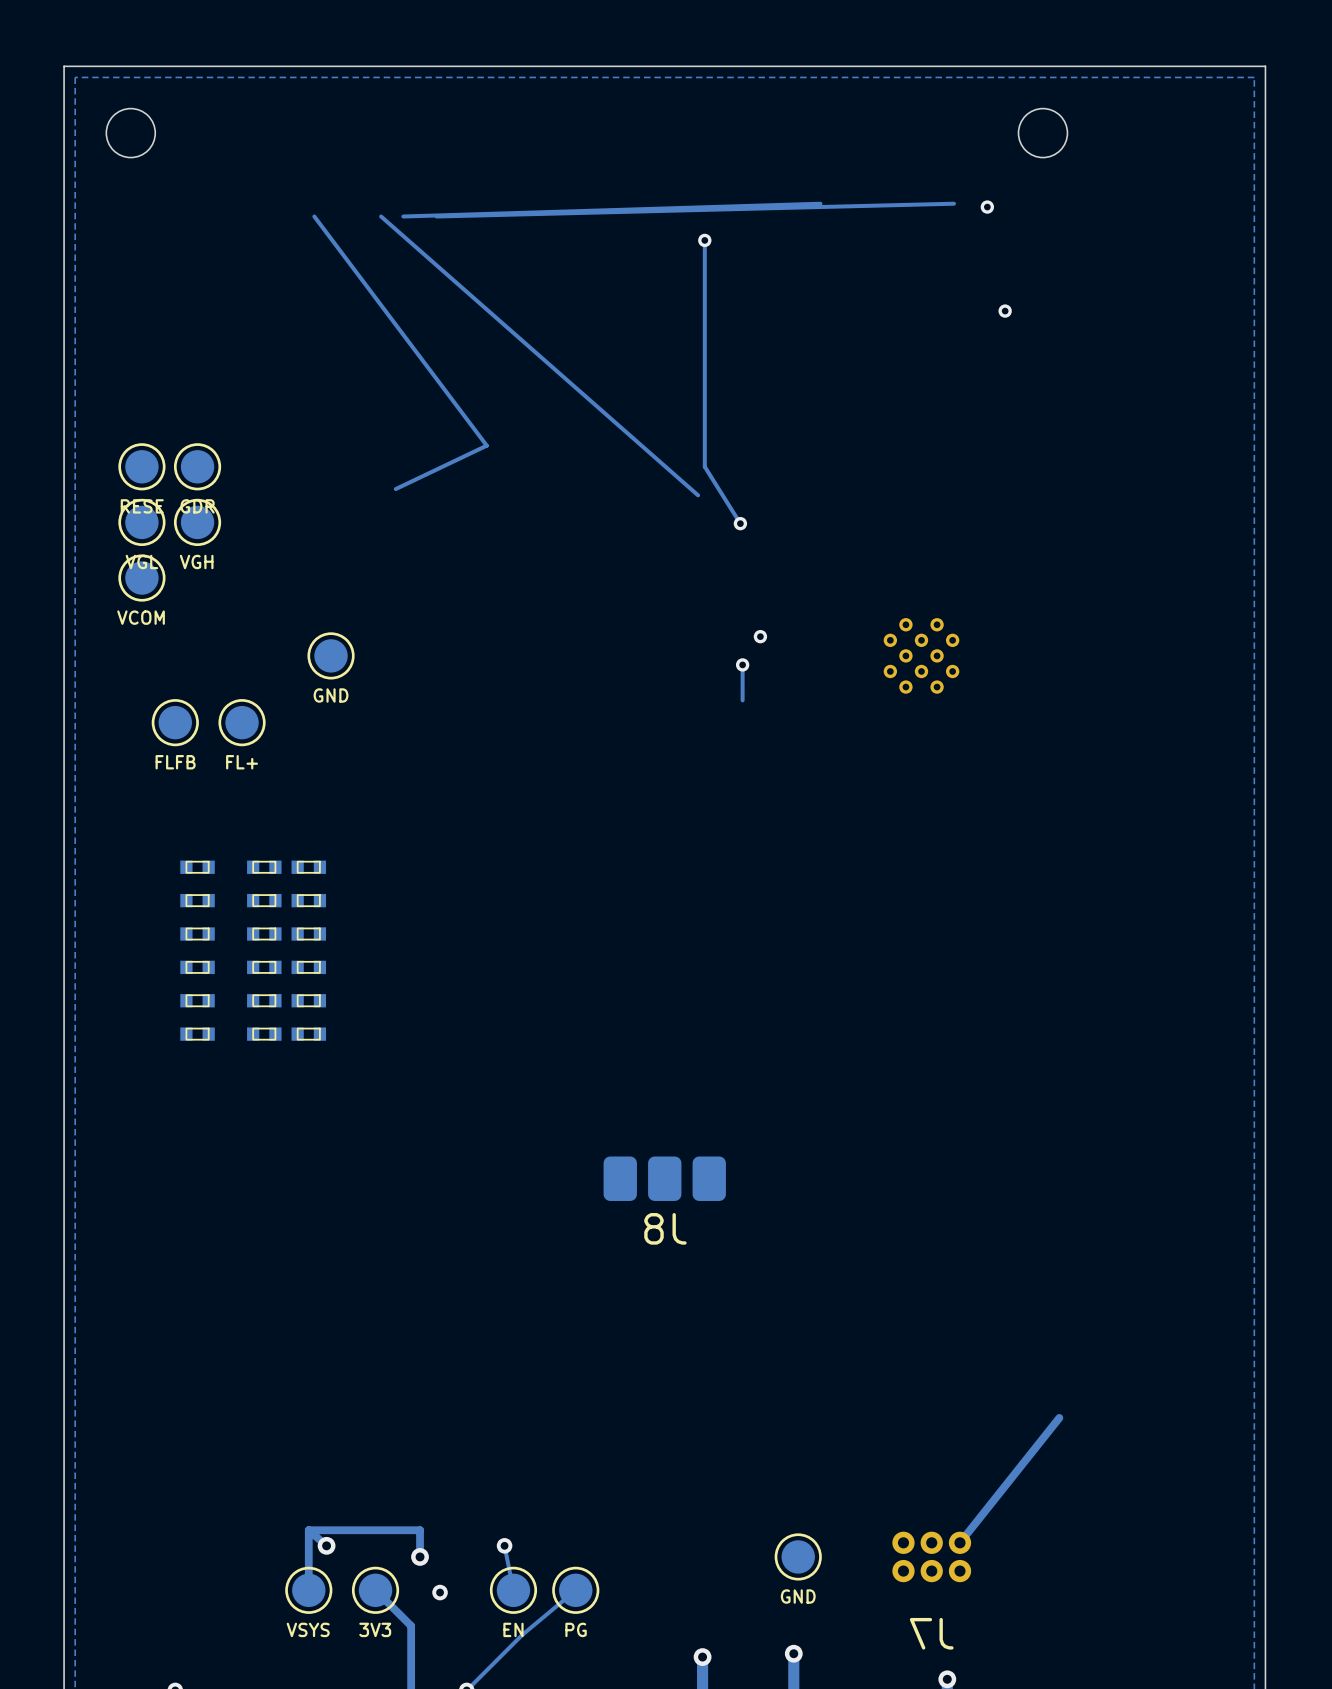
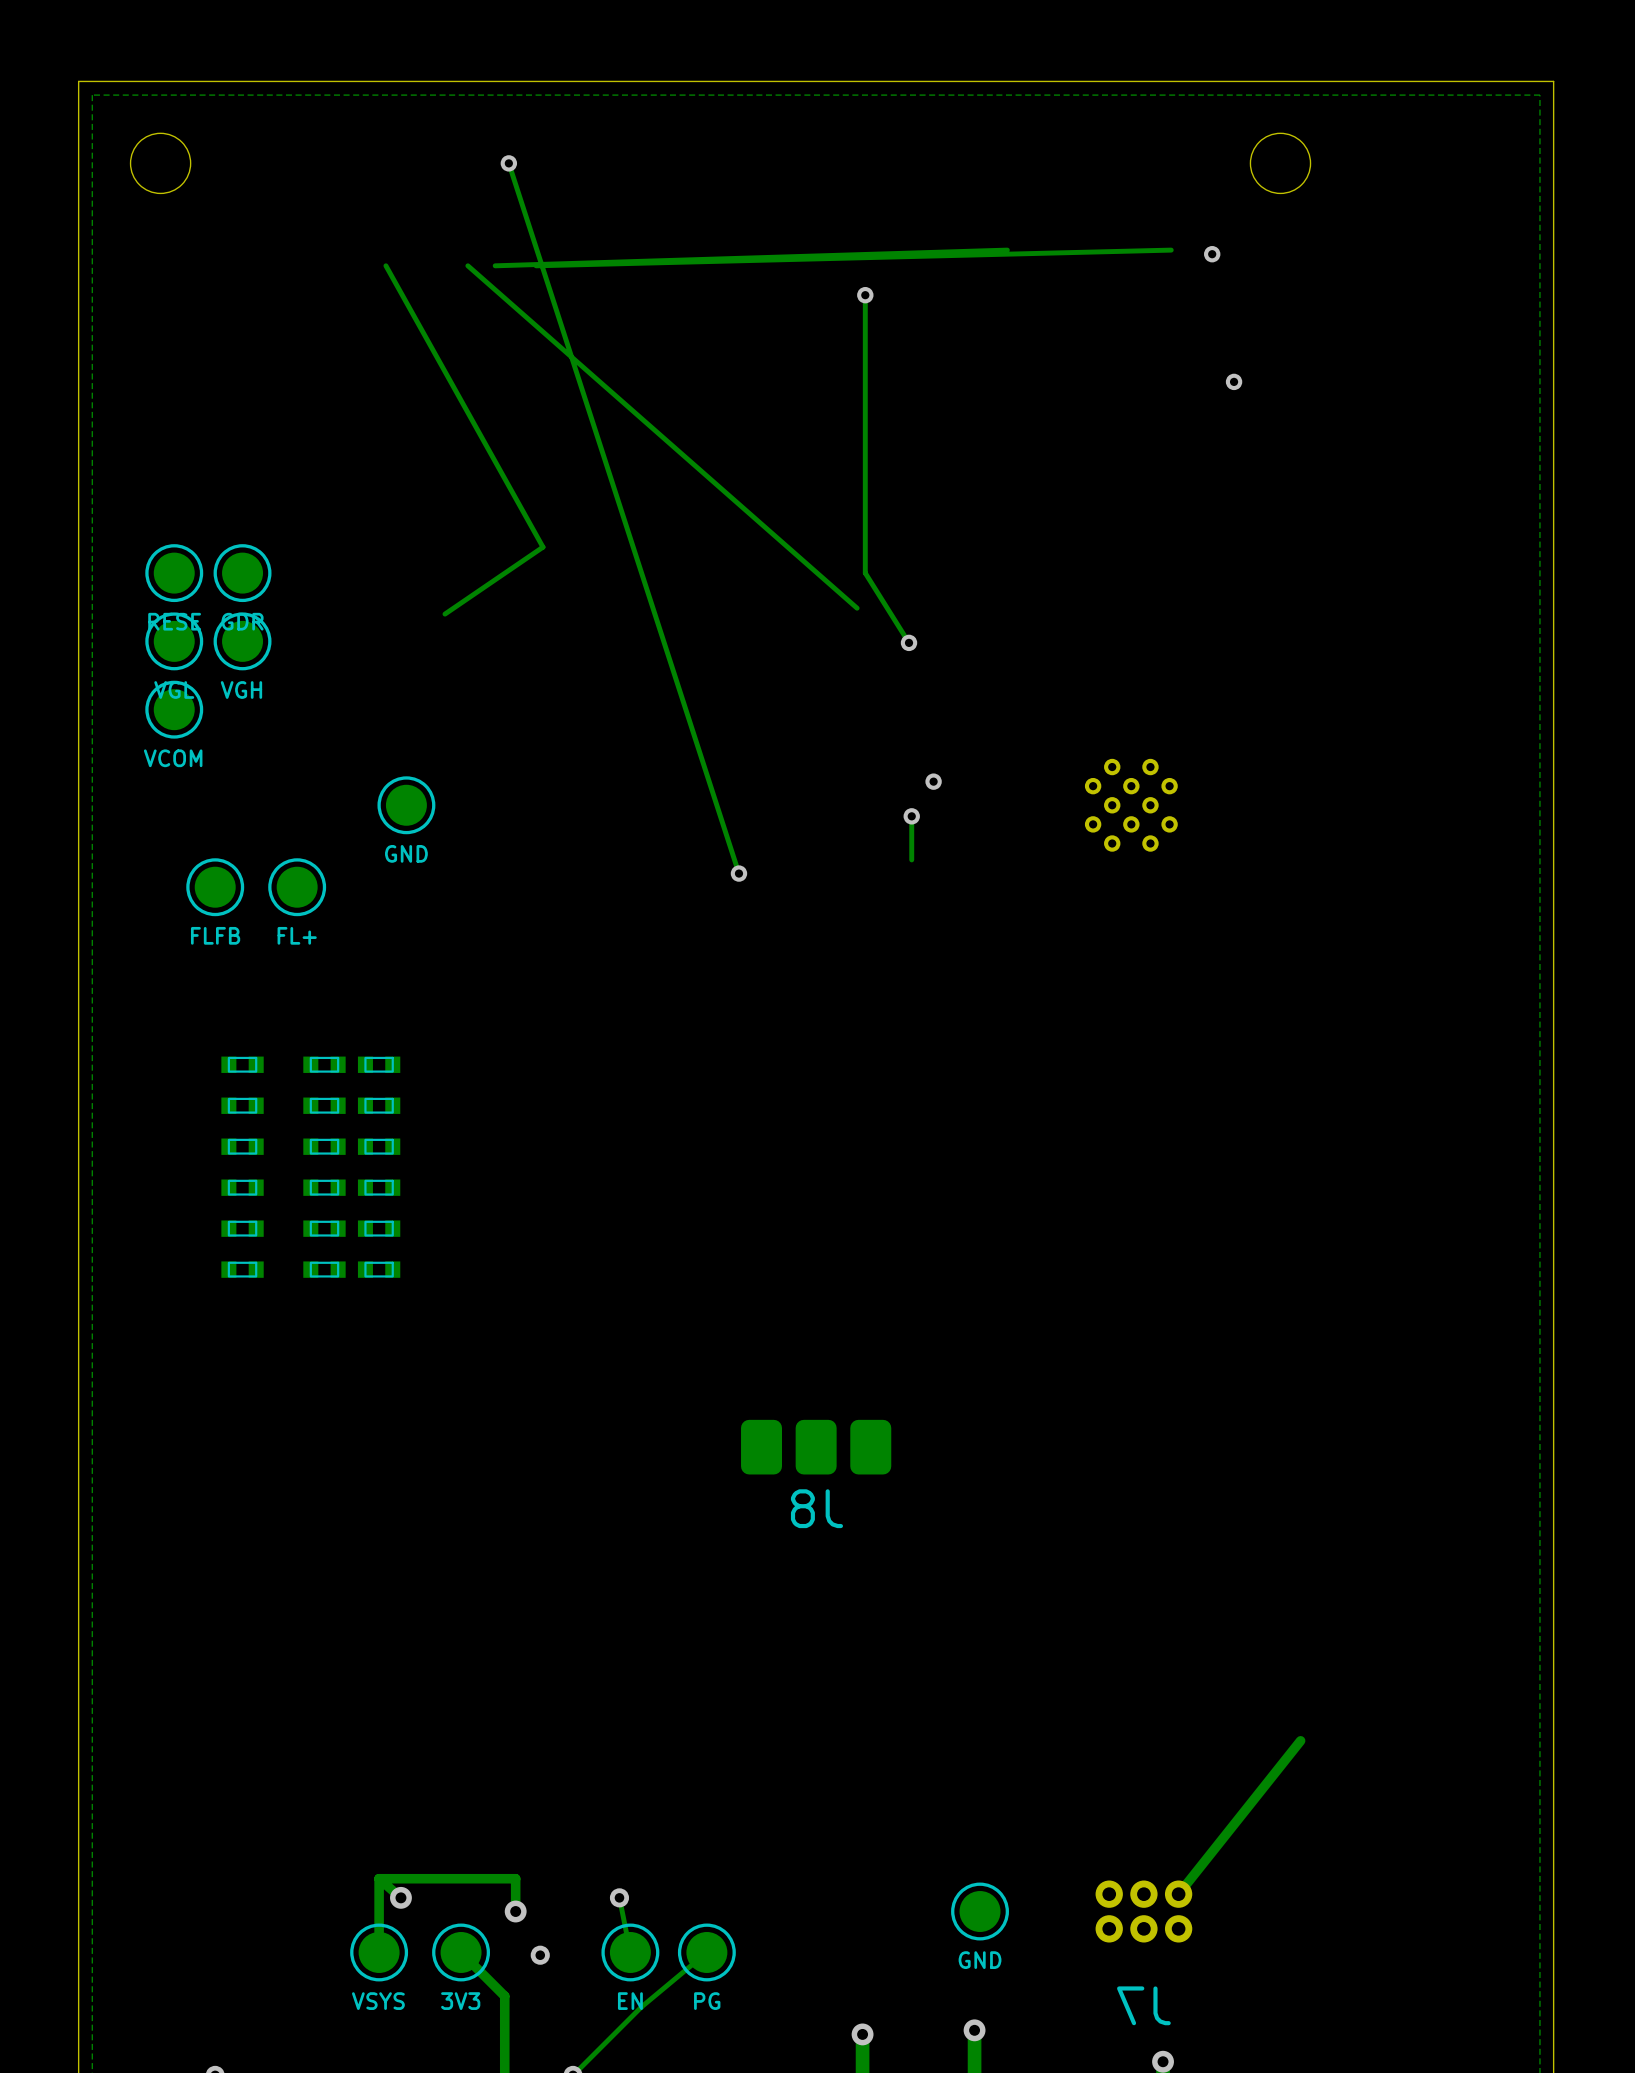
track: none -> (508, 163) (738, 873)
via: none -> (508, 163)
track: (314, 216) (486, 445) (395, 489) -> (385, 265) (542, 547) (445, 614)
via: none -> (738, 873)

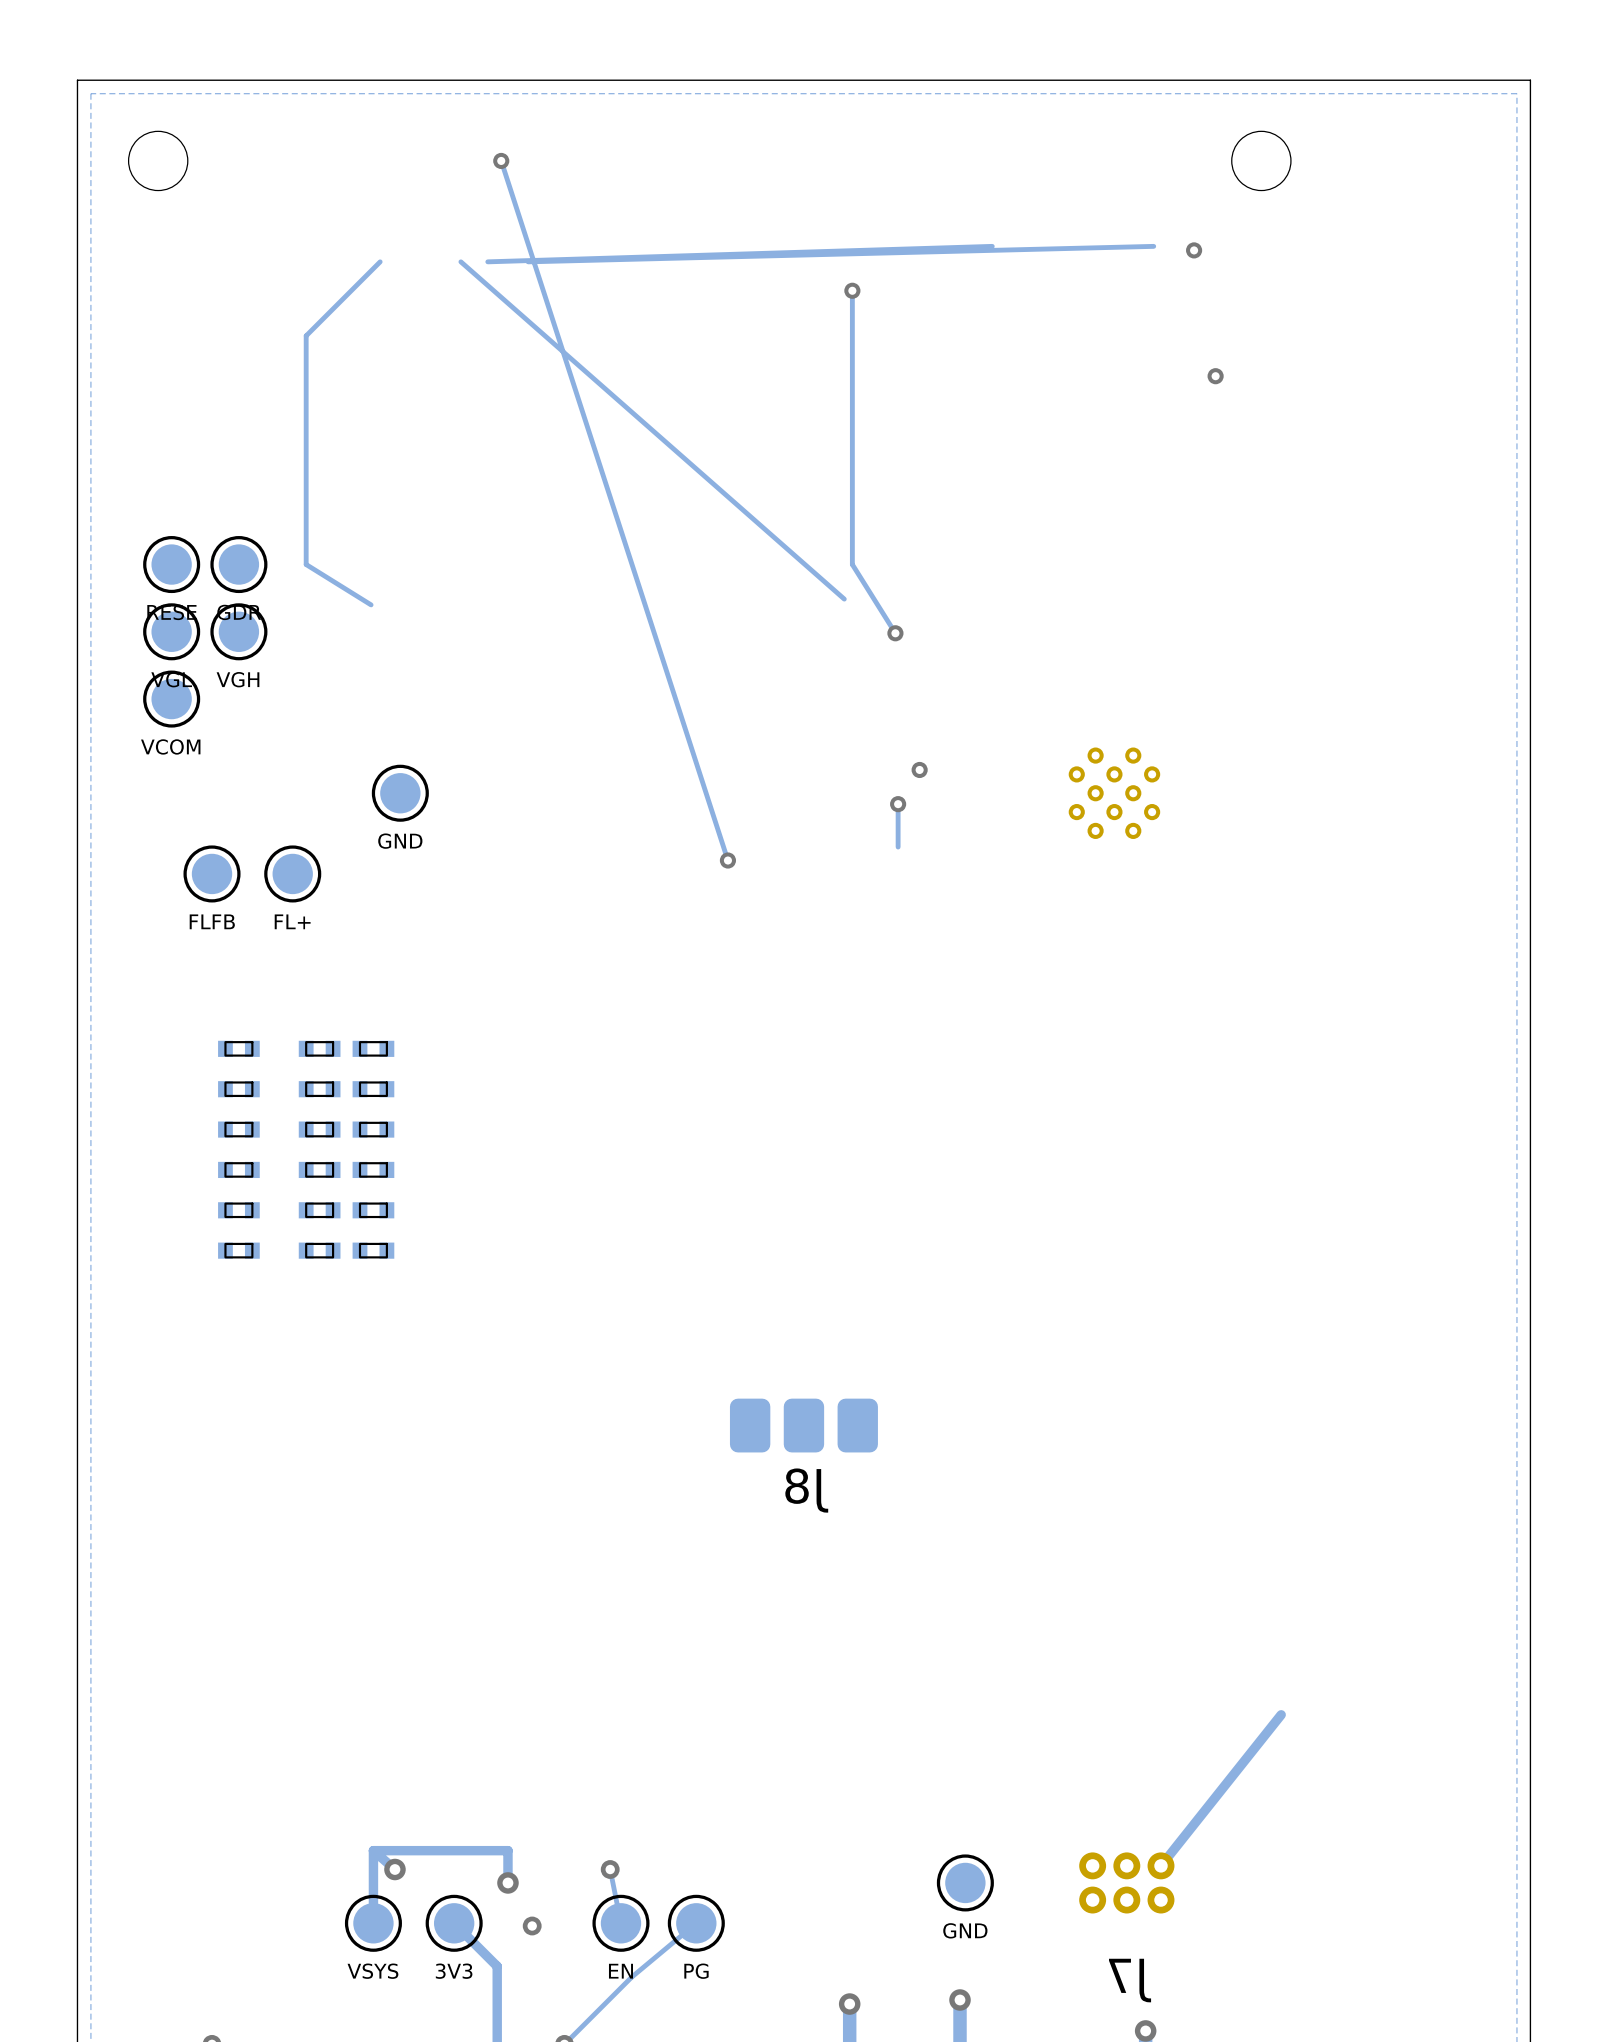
track: (385, 265) (542, 547) (445, 614) -> (380, 261) (306, 335) (306, 564) (371, 604)

